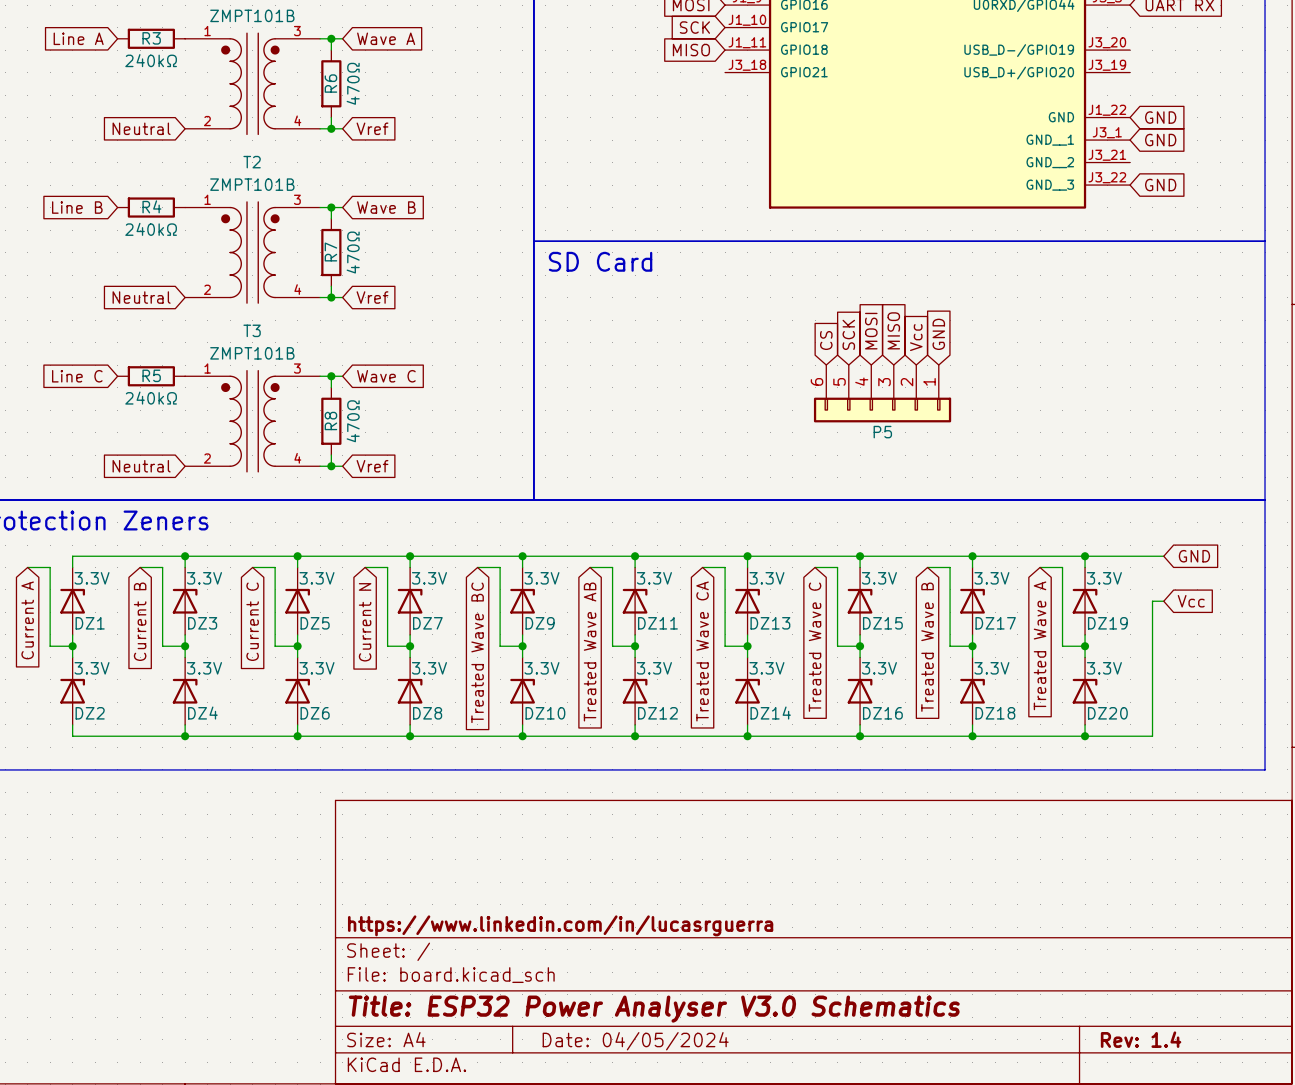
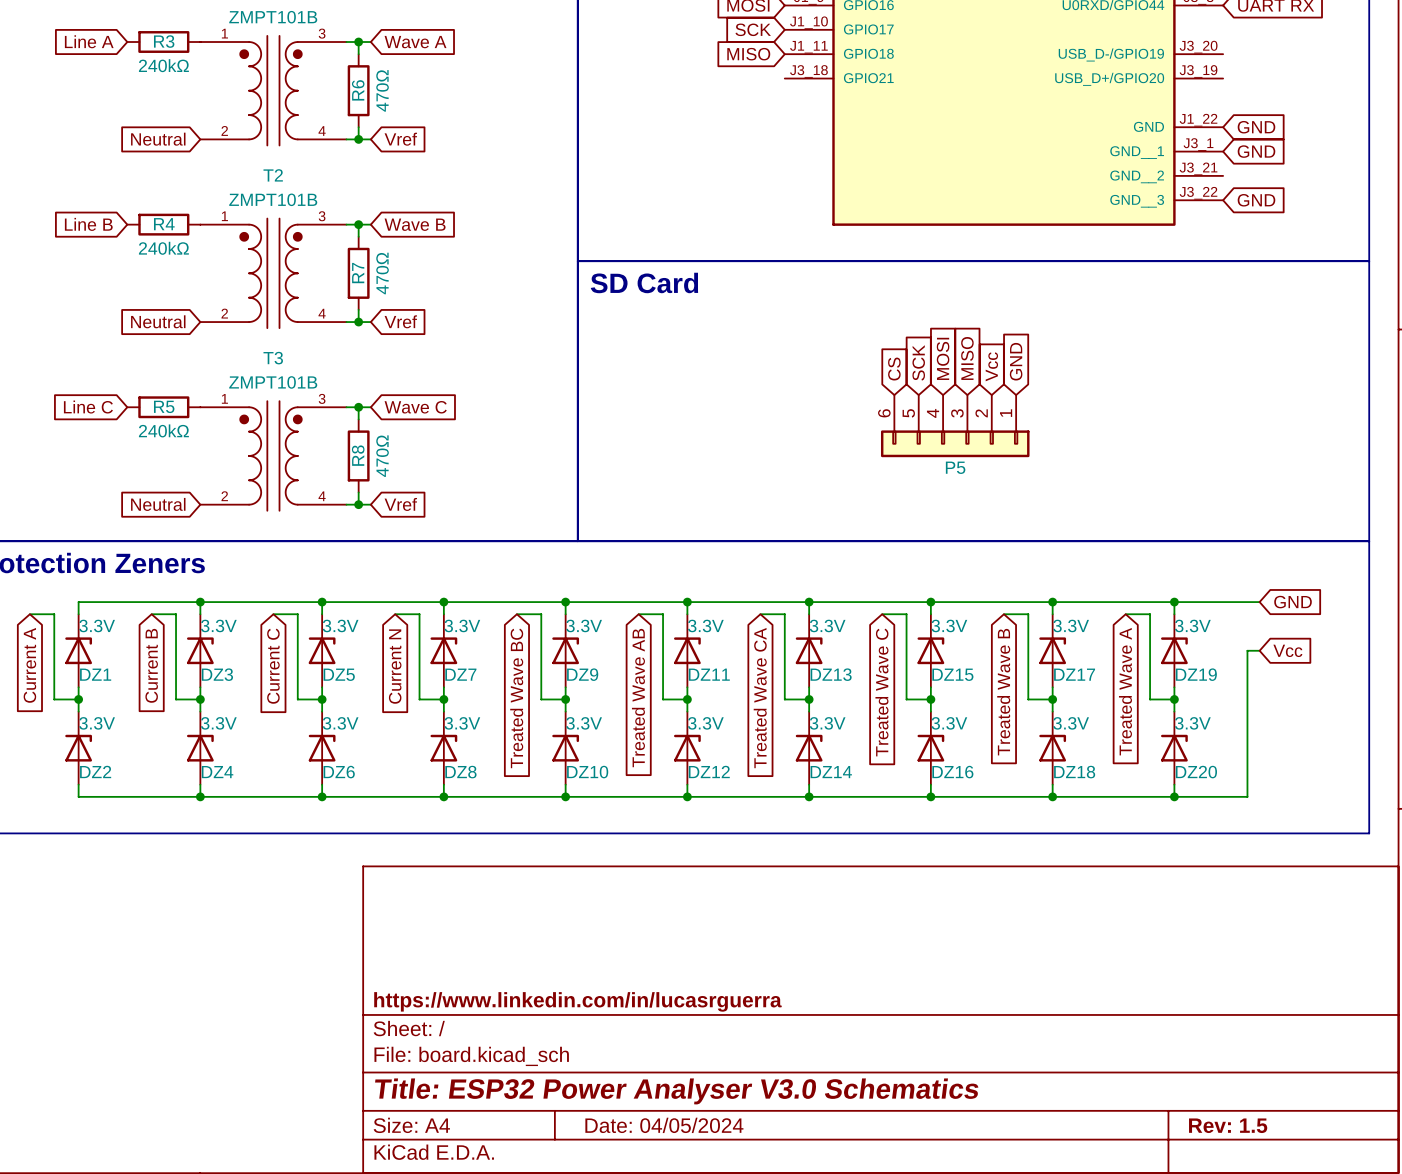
title block: Rev: 1.4 (1141, 1039) -> Rev: 1.5 (1228, 1125)

